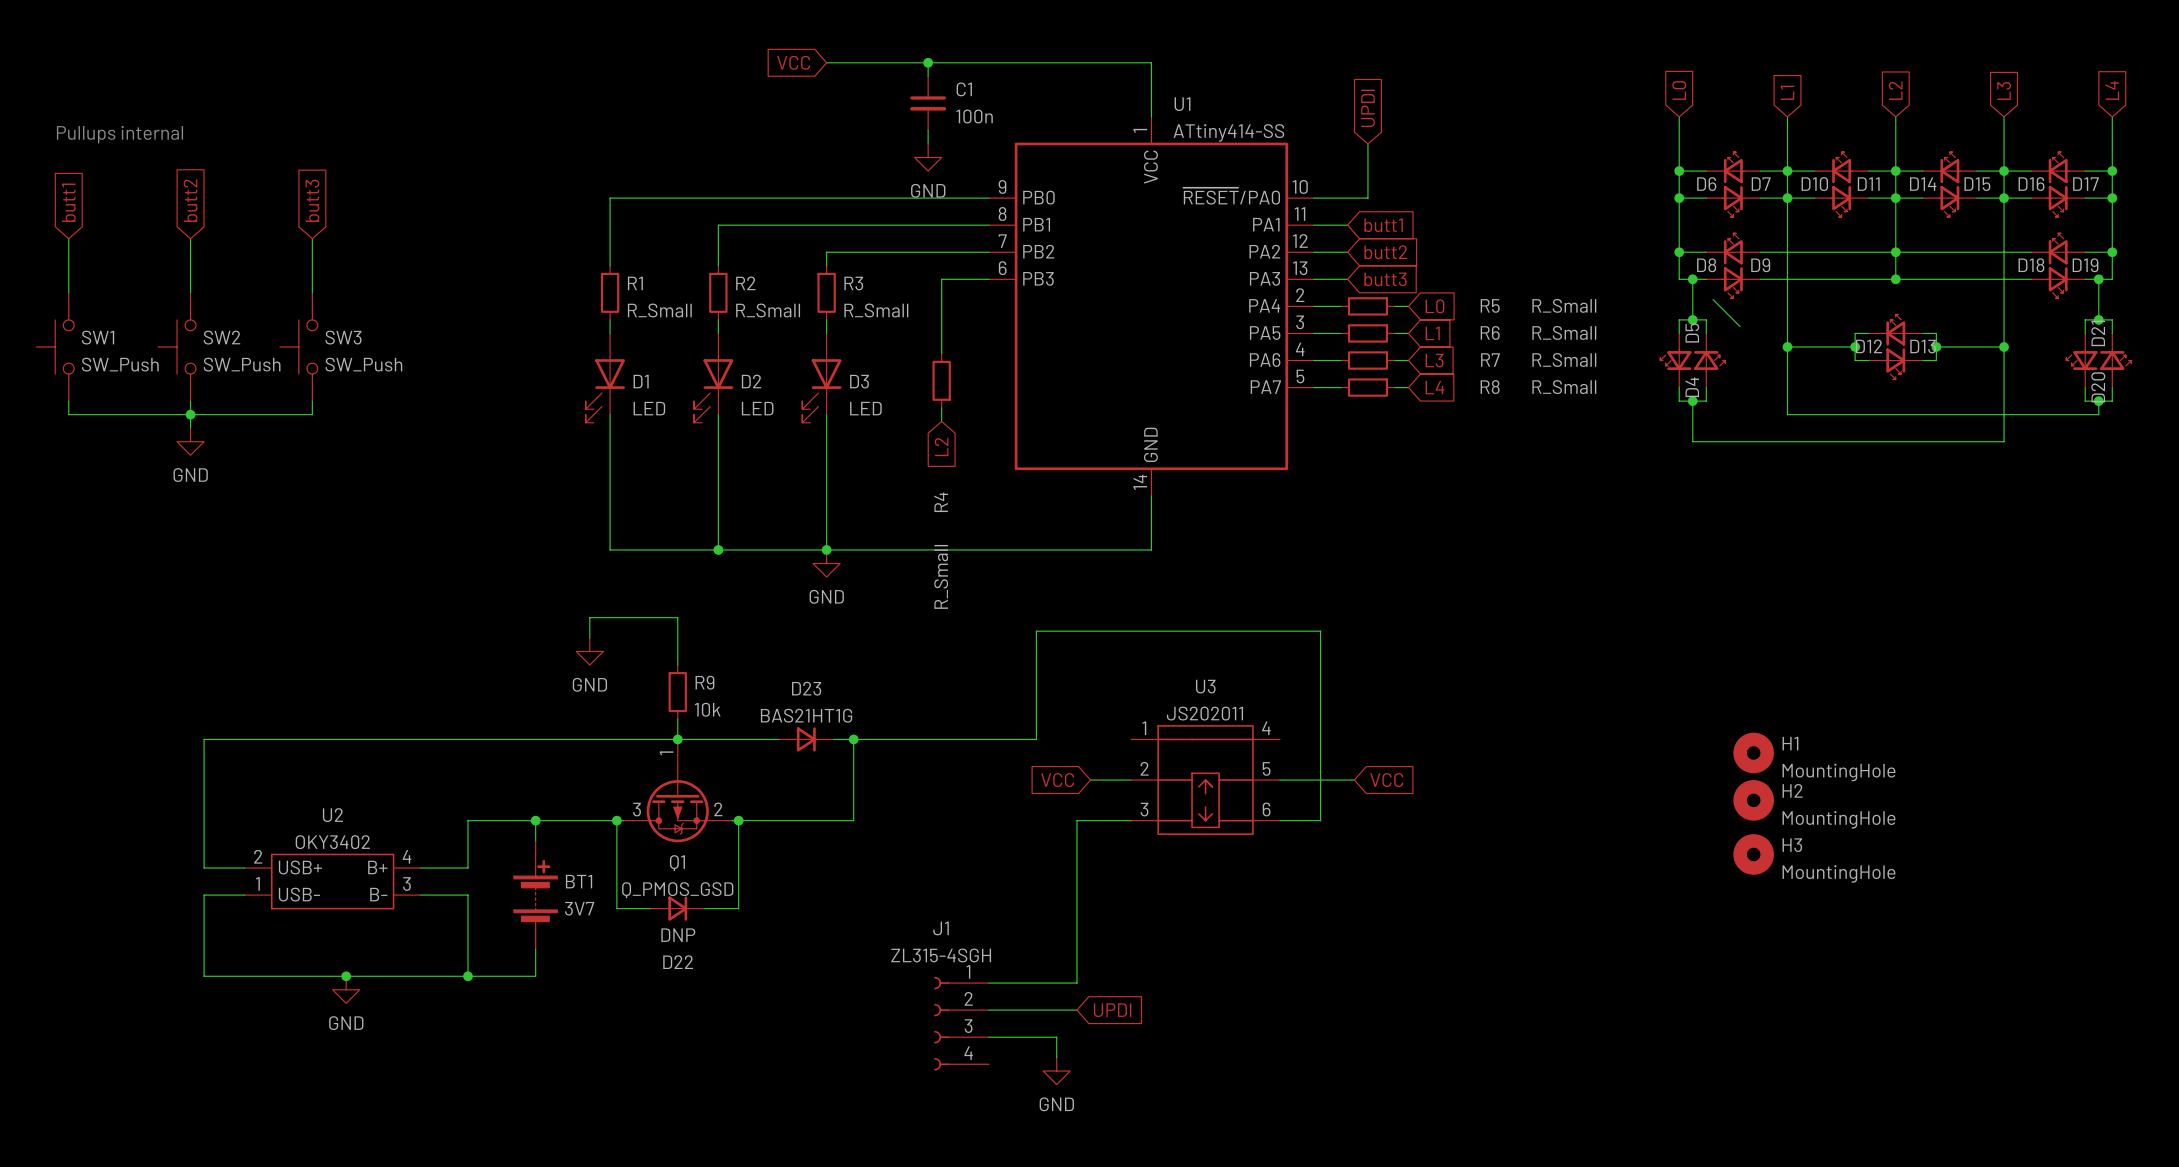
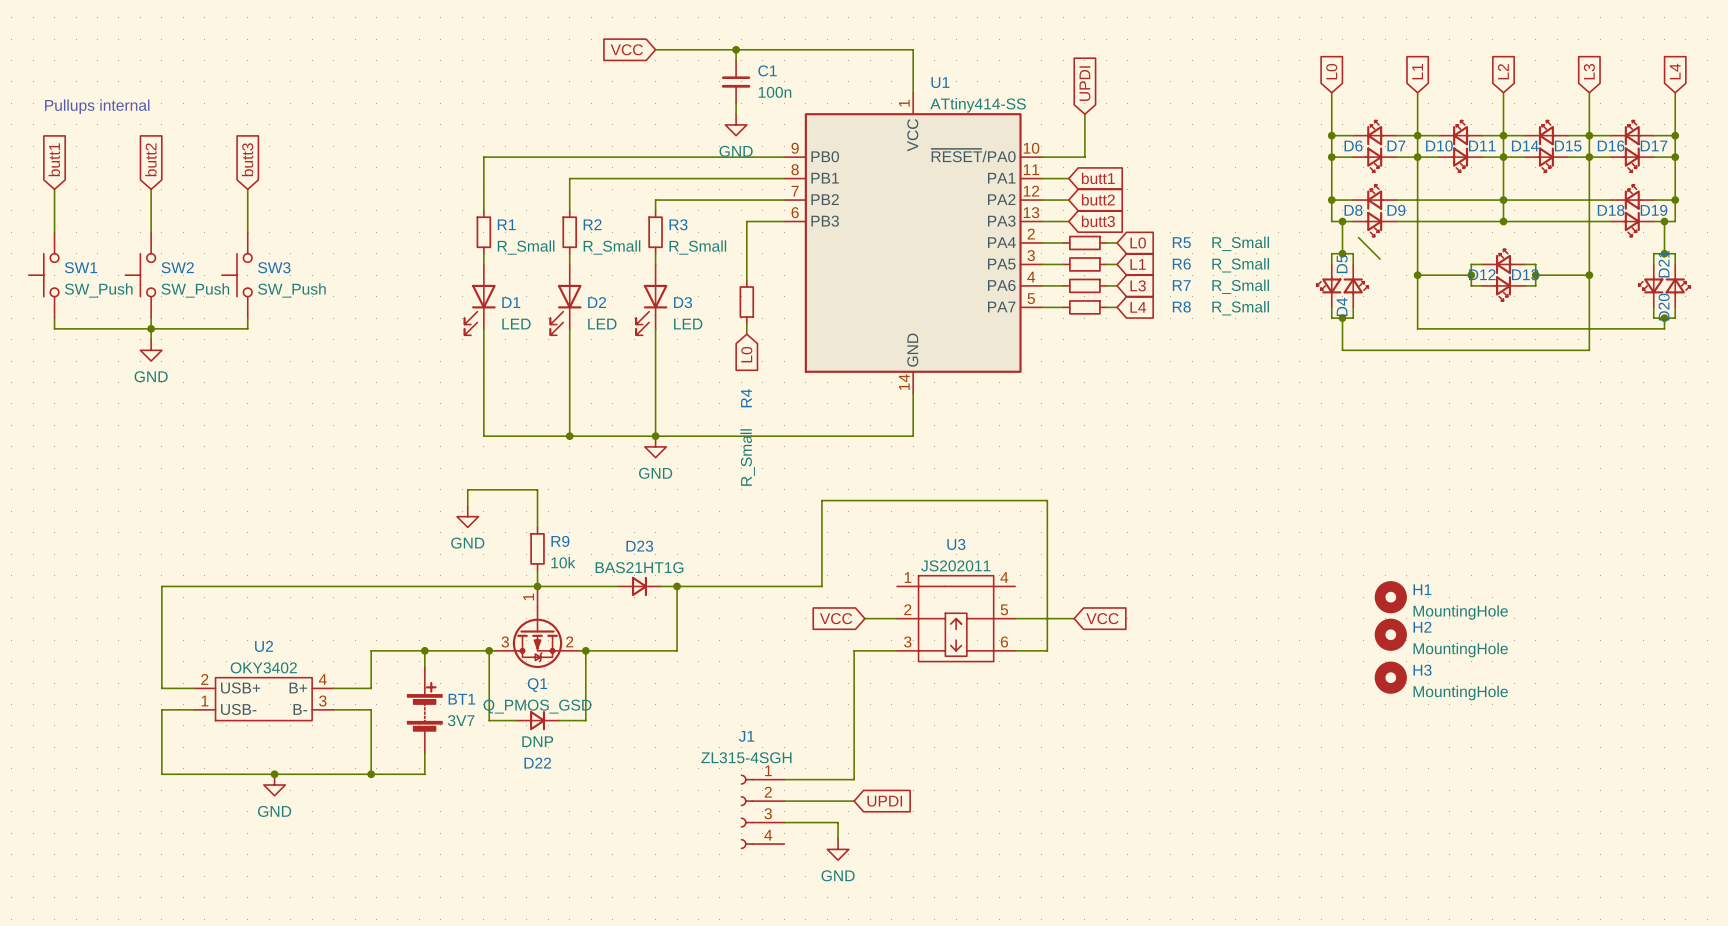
global label: L2 (941, 446) -> L0 (746, 354)

